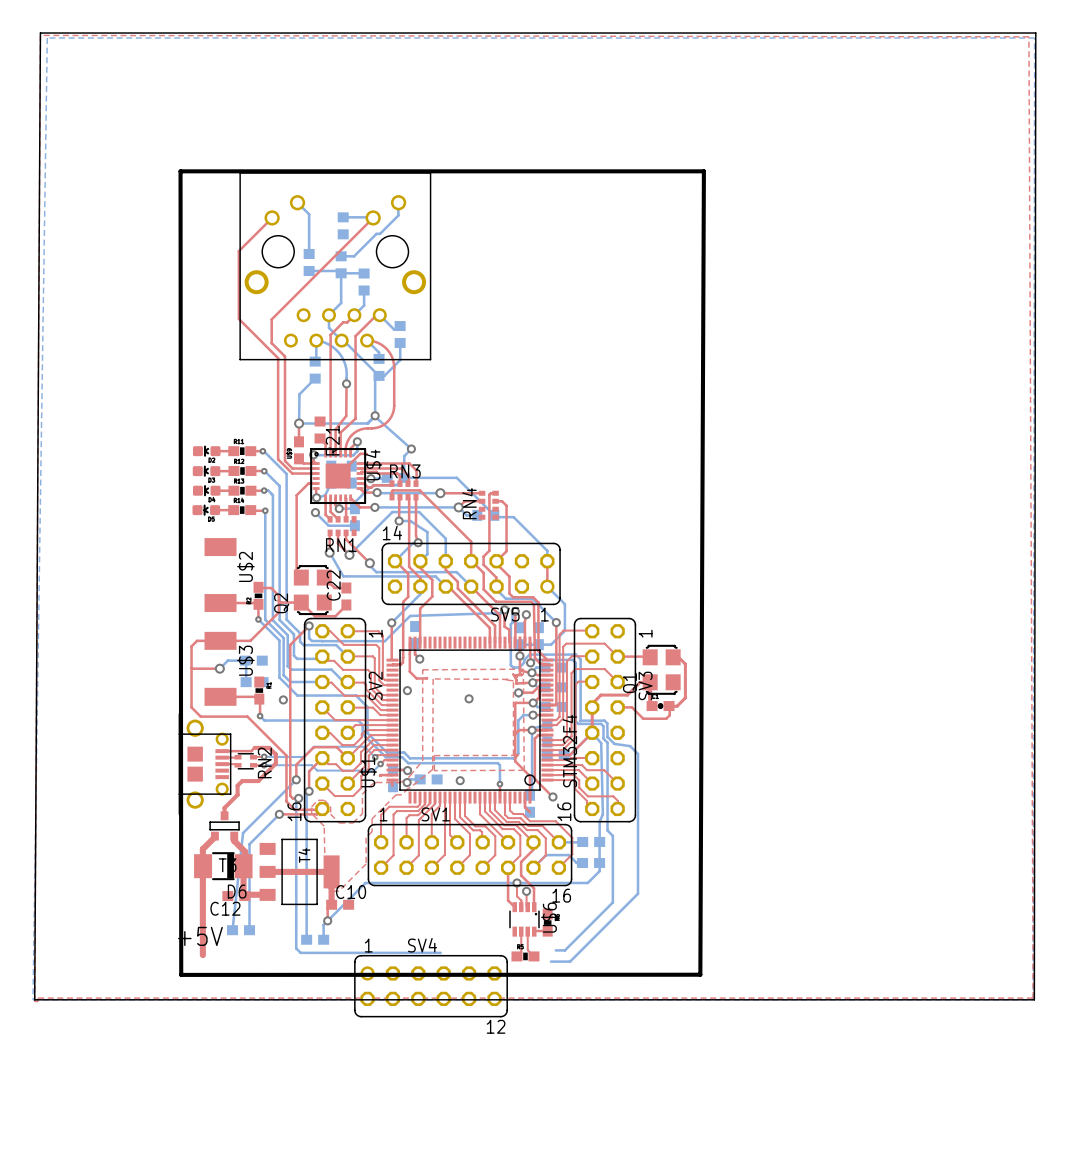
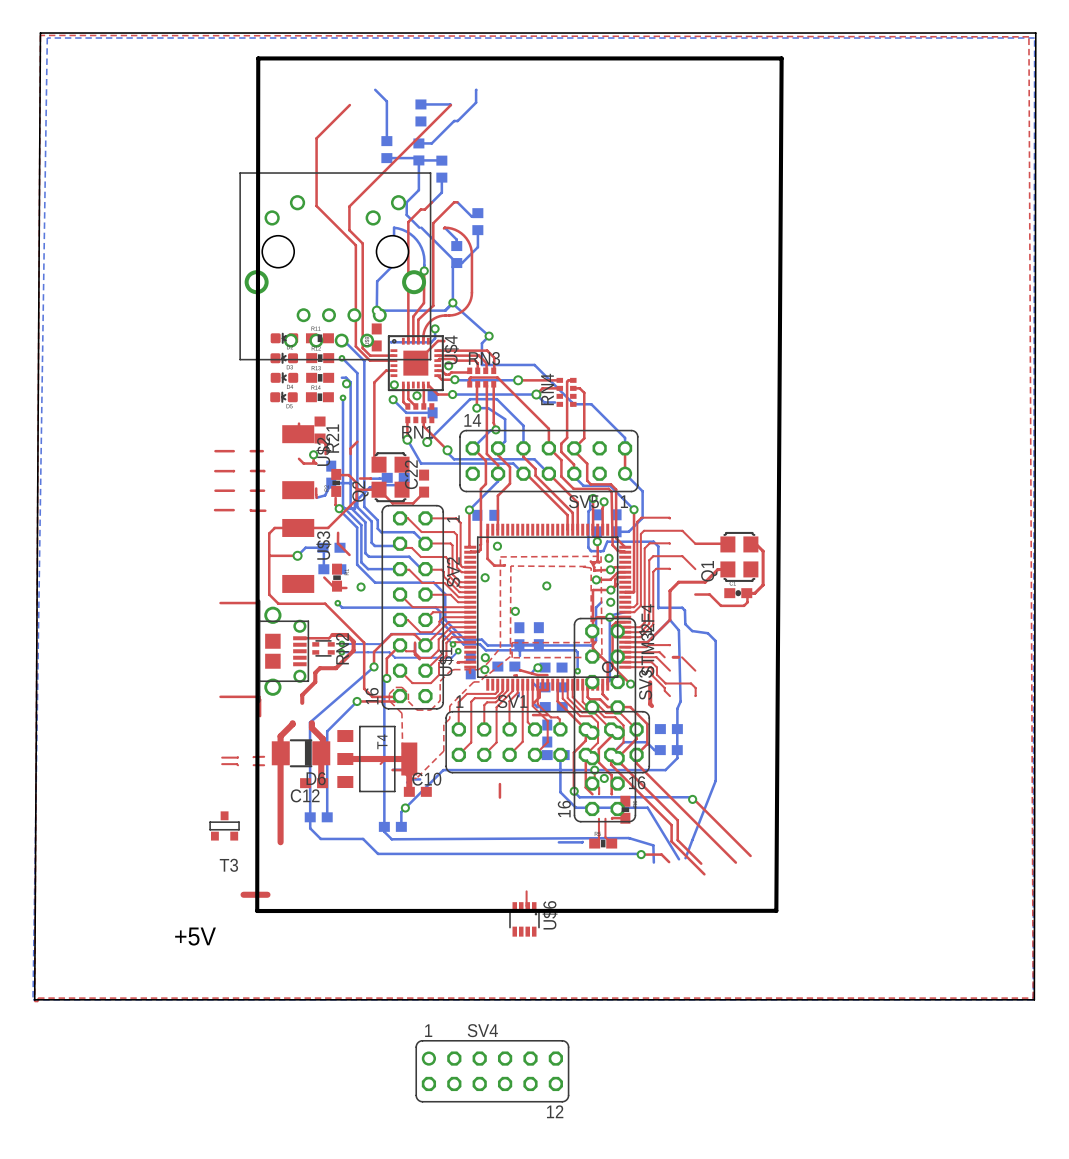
part: none -> (420, 112)
part: none -> (386, 149)
part: none -> (418, 151)
part: none -> (441, 169)
board edge: (180, 171) (181, 974) (700, 974) (703, 171) (180, 171) -> (258, 58) (257, 911) (776, 910) (781, 58) (258, 58)
bottom track: (297, 202) (309, 214) (309, 253) -> (375, 89) (386, 101) (386, 141)
bottom track: (398, 202) (398, 215) (380, 233) (376, 233) (354, 256) (341, 256) -> (476, 89) (476, 102) (457, 121) (454, 121) (431, 143) (418, 143)
top track: (272, 217) (238, 251) (238, 318) (278, 358) (278, 459) (292, 473) (316, 473) -> (349, 105) (316, 138) (316, 206) (355, 245) (355, 346) (370, 360) (393, 360)
bottom track: (343, 217) (373, 217) -> (420, 104) (450, 105)
top track: (373, 217) (271, 319) (271, 343) (284, 356) (284, 460) (292, 468) (316, 468) -> (450, 105) (349, 206) (349, 230) (362, 243) (362, 348) (370, 355) (393, 355)
part: none -> (477, 221)
part: (343, 225) -> none
part: none -> (456, 254)
part: (309, 262) -> none
part: (341, 264) -> none
bottom track: (309, 270) (338, 270) (341, 273) -> (386, 158) (416, 158) (418, 160)
via: none -> (424, 270)
bottom track: (341, 273) (364, 273) -> (418, 160) (441, 160)
bottom track: (341, 273) (341, 303) (329, 315) (329, 327) (341, 340) -> (418, 160) (418, 190) (406, 202) (406, 215) (419, 227)
part: (364, 282) -> none
bottom track: (364, 290) (364, 305) (354, 315) -> (441, 177) (441, 192) (432, 202)
via: none -> (452, 302)
via: none -> (376, 310)
top track: (354, 315) (347, 322) (343, 322) (330, 334) (330, 454) -> (432, 202) (424, 209) (420, 209) (408, 222) (408, 341)
top track: (379, 315) (376, 315) (355, 336) (355, 418) (340, 432) (340, 454) -> (457, 202) (454, 202) (433, 223) (433, 305) (418, 319) (418, 341)
bottom track: (379, 315) (394, 329) (400, 326) -> (457, 202) (471, 216) (477, 213)
via: none -> (435, 328)
part: (400, 334) -> none
via: none -> (489, 336)
bottom track: (343, 340) (379, 375) -> (421, 227) (456, 263)
bottom track: (367, 340) (379, 352) (379, 358) -> (444, 227) (456, 239) (456, 246)
top track: (366, 341) (380, 344) (392, 357) (394, 367) (394, 408) (391, 417) (382, 425) (362, 429) (352, 434) (346, 444) (345, 454) -> (444, 228) (458, 231) (469, 244) (471, 254) (471, 295) (468, 304) (460, 312) (439, 316) (429, 321) (424, 331) (423, 341)
bottom track: (400, 343) (400, 360) (384, 375) (379, 375) -> (477, 230) (477, 247) (462, 263) (456, 263)
via: none -> (341, 358)
bottom track: (316, 360) (316, 340) (332, 346) (343, 360) (346, 383) -> (394, 247) (394, 227) (410, 234) (421, 247) (424, 270)
via: none -> (448, 365)
part: (379, 367) -> none
part: (315, 370) -> none
bottom track: (379, 375) (375, 379) (375, 415) (367, 423) -> (456, 263) (452, 266) (452, 302) (445, 310)
bottom track: none -> (341, 377) (346, 377) (350, 382) (350, 507) (365, 522) (365, 553)
bottom track: (315, 378) (299, 394) (299, 423) (367, 423) -> (392, 265) (377, 281) (376, 310) (445, 310)
via: none -> (454, 379)
via: none -> (518, 380)
top track: (346, 383) (346, 415) (335, 429) (335, 454) -> (424, 270) (423, 303) (413, 316) (412, 341)
via: none -> (394, 384)
via: none -> (452, 394)
via: none -> (536, 394)
via: none -> (416, 395)
via: none -> (343, 397)
via: none -> (393, 399)
part: none -> (432, 404)
via: none -> (476, 408)
via: (375, 415) -> none
via: (299, 423) -> none
bottom track: (367, 423) (374, 416) (411, 449) (404, 456) (404, 477) (456, 477) (496, 517) (513, 517) (547, 550) (547, 561) -> (445, 310) (452, 303) (489, 336) (481, 343) (481, 364) (534, 364) (573, 404) (591, 404) (625, 437) (625, 448)
via: none -> (495, 429)
via: none -> (407, 439)
bottom track: (357, 441) (357, 451) (353, 455) (313, 454) -> (435, 328) (435, 338) (431, 342) (391, 341)
via: (357, 441) -> none
via: none -> (427, 442)
via: (411, 449) -> none
part position: (299, 450) -> (376, 337)
via: none -> (447, 450)
part position: (206, 451) -> (284, 338)
part position: (242, 451) -> (319, 338)
bottom track: (262, 451) (286, 473) (286, 619) (300, 633) (300, 641) (303, 645) (336, 645) (347, 656) -> (340, 338) (364, 361) (364, 506) (377, 520) (377, 528) (381, 532) (413, 532) (425, 543)
via: (262, 451) -> none
top track: (366, 454) (360, 453) (338, 476) -> (444, 341) (437, 340) (415, 363)
top track: (360, 463) (409, 463) (416, 470) (416, 483) -> (437, 350) (487, 350) (494, 357) (493, 370)
top track: (360, 468) (401, 468) (408, 476) (408, 483) -> (437, 355) (478, 355) (486, 363) (485, 370)
part position: (206, 471) -> (284, 358)
part position: (242, 471) -> (320, 358)
bottom track: (264, 471) (279, 486) (279, 620) (293, 634) (293, 655) (297, 658) (320, 658) (322, 656) -> (341, 358) (357, 373) (357, 507) (371, 521) (371, 542) (374, 545) (397, 545) (400, 543)
via: (264, 471) -> none
top track: (360, 473) (361, 471) (397, 473) (399, 476) (399, 483) -> (437, 360) (439, 359) (475, 360) (477, 363) (477, 370)
part: (351, 474) -> none
U$4 position: (338, 476) -> (415, 363)
via: (370, 478) -> none
top track: (316, 483) (308, 483) (296, 495) (296, 572) (301, 577) -> (393, 370) (386, 370) (374, 382) (374, 460) (379, 464)
top track: (360, 483) (364, 483) (368, 487) (392, 483) -> (437, 370) (441, 370) (445, 374) (469, 370)
top track: (360, 488) (364, 492) (377, 492) -> (437, 375) (441, 379) (454, 379)
part position: (206, 490) -> (284, 377)
part position: (242, 490) -> (320, 377)
bottom track: (264, 490) (268, 490) (272, 495) (272, 620) (287, 635) (287, 666) (291, 669) (331, 669) (343, 682) (347, 682) -> none
via: (264, 490) -> none
RN3 position: (404, 490) -> (481, 377)
bottom track: (377, 492) (440, 493) -> (454, 379) (518, 380)
via: (377, 492) -> none
top track: (440, 493) (482, 493) -> (518, 380) (559, 380)
via: (440, 493) -> none
top track: (495, 493) (489, 494) (489, 550) (483, 556) (483, 564) (496, 577) (496, 586) -> (573, 380) (567, 381) (567, 437) (561, 443) (561, 451) (574, 464) (574, 473)
via: (316, 497) -> none
top track: (325, 497) (325, 514) (330, 519) -> (403, 385) (403, 401) (407, 406)
top track: (330, 497) (330, 511) (338, 519) -> (408, 385) (408, 398) (415, 406)
top track: (345, 497) (346, 519) -> (423, 385) (423, 406)
top track: (350, 497) (360, 507) (374, 507) -> (428, 385) (437, 394) (452, 394)
top track: (392, 497) (392, 490) (419, 490) (471, 541) (471, 561) (483, 573) (483, 589) (495, 601) (531, 601) (533, 604) (534, 658) (540, 663) (547, 665) -> (469, 384) (470, 377) (497, 377) (548, 428) (548, 448) (561, 460) (561, 476) (573, 488) (608, 488) (611, 491) (612, 545) (617, 550) (625, 552)
top track: (400, 497) (399, 521) -> (477, 384) (476, 408)
top track: (408, 497) (409, 566) (420, 578) (420, 586) -> (485, 384) (486, 454) (498, 465) (498, 473)
top track: (416, 497) (416, 535) (418, 542) -> (493, 384) (493, 422) (495, 429)
bottom track: none -> (593, 498) (590, 501) (588, 511) (588, 547) (590, 550) (603, 551) (607, 541) (653, 541) (658, 546) (658, 608) (682, 607) (684, 610) (685, 624) (692, 631) (707, 633) (715, 641) (715, 780) (685, 858)
via: none -> (593, 498)
top track: (482, 501) (464, 501) (458, 507) -> (559, 388) (542, 388) (536, 394)
top track: (495, 501) (502, 501) (506, 505) (506, 551) (496, 561) (496, 563) (509, 576) (509, 593) (513, 597) (533, 597) (538, 602) (538, 651) (547, 660) -> (573, 388) (579, 388) (584, 392) (584, 438) (574, 448) (574, 450) (587, 463) (587, 480) (590, 484) (610, 484) (616, 489) (616, 538) (625, 547)
via: none -> (604, 501)
RN4 position: (488, 505) -> (566, 392)
bottom track: none -> (336, 506) (357, 527) (357, 564) (375, 582) (433, 582) (445, 594) (445, 620) (464, 639) (481, 639) (487, 645) (591, 645) (596, 640) (596, 607) (601, 602)
bottom track: (374, 507) (458, 507) (466, 515) (477, 515) -> (452, 394) (536, 394) (544, 402) (555, 402)
via: (374, 507) -> none
via: (458, 507) -> none
via: none -> (469, 509)
via: none -> (634, 509)
part position: (206, 510) -> (284, 397)
part position: (242, 510) -> (319, 397)
bottom track: (265, 510) (265, 619) (283, 638) (283, 675) (290, 682) (322, 682) -> (343, 397) (343, 506) (361, 525) (361, 562) (368, 569) (400, 569)
via: (265, 510) -> none
bottom track: (315, 512) (328, 525) (354, 525) -> (393, 399) (406, 412) (432, 412)
via: (315, 512) -> none
part: (354, 517) -> none
bottom track: (399, 521) (410, 521) (427, 532) (427, 554) (420, 561) -> (476, 408) (488, 408) (505, 419) (505, 441) (498, 448)
via: (399, 521) -> none
part: none -> (597, 523)
part: none -> (616, 523)
RN1 position: (342, 526) -> (419, 413)
top track: (330, 532) (329, 552) -> (407, 419) (407, 439)
top track: (346, 532) (345, 539) (369, 563) -> (423, 419) (423, 426) (447, 450)
via: none -> (597, 541)
bottom track: (418, 542) (412, 543) (395, 561) -> (495, 429) (490, 430) (472, 448)
via: (418, 542) -> none
top track: none -> (750, 544) (756, 544) (763, 551) (763, 585) (754, 593) (746, 593) (747, 602) (744, 605) (720, 605) (709, 594) (695, 594)
via: none -> (497, 546)
part: none -> (331, 547)
bottom track: (329, 552) (343, 576) (435, 576) (445, 586) -> (407, 439) (421, 463) (513, 463) (523, 473)
via: (329, 552) -> none
bottom track: (349, 553) (349, 554) (392, 512) (419, 512) (445, 538) (445, 561) -> (427, 440) (427, 442) (470, 399) (496, 399) (523, 425) (523, 448)
bottom track: none -> (365, 553) (368, 556) (409, 556) (421, 569) (425, 569)
via: (349, 554) -> none
via: none -> (297, 555)
via: none -> (609, 558)
top track: (395, 561) (408, 573) (408, 596) (403, 601) (402, 662) (392, 665) -> (472, 448) (485, 460) (485, 484) (480, 489) (480, 549) (470, 552)
top track: (420, 561) (420, 568) (432, 579) (432, 596) (420, 608) (420, 642) -> (498, 448) (498, 455) (510, 467) (510, 483) (497, 495) (497, 529)
top track: (445, 561) (445, 569) (457, 581) (457, 588) (495, 625) (495, 642) -> (523, 448) (523, 456) (535, 469) (535, 475) (572, 512) (572, 529)
top track: (547, 561) (547, 586) -> (625, 448) (625, 473)
bottom track: (369, 563) (376, 572) (456, 572) (471, 586) -> (447, 450) (454, 459) (534, 459) (548, 473)
via: (369, 563) -> none
part: none -> (332, 569)
via: none -> (610, 569)
SV5 position: (471, 573) -> (548, 461)
U$2 position: (220, 575) -> (298, 462)
via: none -> (485, 577)
top track: none -> (625, 577) (617, 577) (615, 579) (615, 585) (610, 590) (611, 590) (617, 584) (611, 590) (593, 590) (592, 590) (592, 648) (607, 663) (607, 684)
via: none -> (596, 579)
via: none -> (546, 585)
bottom track: (420, 586) (420, 594) (391, 622) -> (498, 473) (498, 481) (469, 509)
top track: (445, 586) (448, 586) (489, 628) (489, 642) -> (523, 473) (526, 473) (567, 515) (567, 529)
top track: (471, 586) (499, 615) (499, 642) -> (548, 473) (577, 502) (577, 529)
bottom track: (496, 586) (496, 589) (505, 598) (532, 598) (556, 622) -> (574, 473) (574, 476) (583, 485) (610, 485) (634, 509)
bottom track: (547, 586) (564, 604) (564, 630) (551, 644) (538, 644) -> (625, 473) (642, 491) (642, 517) (628, 531) (616, 531)
top track: (258, 587) (271, 588) (278, 595) (278, 612) (250, 640) (197, 640) (191, 646) (191, 707) (200, 716) (247, 716) (286, 755) (286, 801) (294, 809) (321, 809) -> (336, 474) (348, 475) (356, 482) (356, 499) (328, 527) (274, 527) (269, 533) (269, 594) (278, 603) (325, 603) (364, 642) (364, 688) (372, 696) (399, 696)
via: none -> (361, 587)
Q2 position: (312, 590) -> (390, 477)
via: none -> (610, 590)
part position: (258, 595) -> (336, 482)
C22 position: (346, 596) -> (424, 483)
top track: (278, 600) (280, 602) (301, 602) (314, 616) (335, 616) (346, 604) -> (356, 487) (358, 489) (379, 489) (392, 503) (413, 503) (424, 492)
via: none -> (610, 602)
via: none -> (337, 603)
top track: (504, 609) (504, 626) (509, 629) (509, 642) -> none
bottom track: (504, 609) (501, 613) (410, 615) (384, 641) (311, 641) (309, 638) (309, 625) -> none
via: (504, 609) -> none
top track: (515, 611) (514, 642) -> (593, 498) (592, 529)
bottom track: (515, 611) (512, 614) (510, 624) (510, 665) (513, 667) -> none
top track: (526, 614) (524, 642) -> (604, 501) (602, 529)
via: (526, 614) -> none
via: none -> (609, 617)
bottom track: (258, 619) (279, 640) (279, 677) (297, 695) (356, 695) (367, 707) (367, 733) (386, 752) (404, 752) (409, 758) (513, 758) (518, 753) (518, 720) (523, 715) (533, 715) -> none
via: (258, 619) -> none
top track: (391, 622) (392, 660) -> (469, 509) (470, 547)
via: (391, 622) -> none
top track: (556, 622) (556, 704) (547, 705) (556, 705) -> (634, 509) (634, 591) (625, 592) (633, 592)
via: (556, 622) -> none
top track: (309, 625) (290, 644) (290, 795) (292, 798) (298, 798) -> none
via: (309, 625) -> none
top track: (322, 631) (330, 631) (343, 644) (376, 644) (379, 647) (379, 680) (383, 685) (392, 685) -> (400, 518) (407, 518) (421, 532) (453, 532) (456, 535) (456, 567) (461, 572) (470, 572)
top track: (347, 631) (378, 631) (382, 635) (382, 678) (384, 680) (392, 680) -> (425, 518) (456, 518) (460, 522) (460, 565) (462, 567) (470, 567)
top track: (592, 631) (563, 630) (559, 634) (559, 716) (556, 720) (547, 720) -> (669, 518) (641, 517) (637, 521) (637, 603) (634, 607) (625, 607)
part: (415, 635) -> none
top track: (410, 642) (409, 671) (416, 678) (427, 678) -> (487, 529) (487, 558) (494, 565) (504, 565)
top track: (519, 642) (519, 673) (521, 675) (516, 676) -> (597, 529) (597, 560) (599, 562) (594, 563)
top track: (529, 642) (530, 662) -> none
via: none -> (341, 643)
via: none -> (452, 644)
via: none -> (458, 651)
via: none -> (341, 652)
top track: none -> (625, 652) (659, 652) (664, 657)
via: (519, 655) -> none
top track: (322, 656) (326, 660) (334, 660) (343, 669) (367, 669) (370, 672) (370, 688) (382, 700) (392, 700) -> (400, 543) (404, 547) (411, 547) (420, 556) (445, 556) (448, 560) (448, 575) (460, 587) (470, 587)
top track: (347, 656) (372, 656) (374, 658) (374, 687) (382, 695) (392, 695) -> (425, 543) (450, 543) (452, 545) (452, 574) (460, 582) (470, 582)
top track: (592, 656) (572, 656) (566, 661) (566, 735) (562, 740) (547, 740) -> (669, 543) (649, 543) (644, 548) (644, 622) (640, 627) (625, 627)
via: none -> (485, 657)
top track: (650, 657) (617, 656) (604, 643) (566, 643) (563, 646) (563, 718) (556, 725) (547, 725) -> (727, 544) (695, 543) (682, 530) (644, 530) (640, 533) (640, 605) (634, 612) (625, 612)
top track: (678, 657) (685, 664) (685, 697) (677, 706) (669, 706) (669, 715) (666, 718) (643, 718) (631, 707) (617, 707) -> none
top track: none -> (681, 657) (695, 670)
via: (419, 659) -> none
part: (253, 660) -> none
bottom track: (530, 662) (530, 659) (572, 659) (575, 662) (575, 721) (578, 723) (601, 723) (603, 726) (603, 738) (607, 742) (607, 830) (612, 835) (612, 902) (564, 950) (555, 950) -> none
via: (530, 662) -> none
part: none -> (470, 665)
bottom track: none -> (374, 666) (310, 722) (310, 828) (320, 838) (363, 838) (378, 853) (641, 854)
via: none -> (374, 666)
part: none -> (506, 666)
top track: (191, 667) (219, 668) -> (269, 555) (297, 555)
bottom track: (513, 667) (519, 667) (529, 654) (575, 654) (580, 659) (580, 721) (604, 720) (607, 723) (607, 737) (614, 743) (630, 746) (638, 753) (638, 893) (570, 961) (551, 961) -> none
via: none -> (537, 667)
bottom track: (219, 668) (227, 660) (245, 660) (246, 682) -> (297, 555) (305, 547) (323, 547) (323, 569)
via: (219, 668) -> none
U$3 position: (220, 668) -> (298, 555)
via: none -> (484, 669)
top zone outline: (523, 669) (422, 669) (422, 760) (410, 775) (400, 782) (372, 783) (362, 794) (362, 813) (353, 822) (339, 822) (330, 814) (330, 806) (324, 800) (318, 800) (311, 806) (311, 813) (324, 826) (325, 884) (331, 891) (338, 891) (366, 863) (366, 837) (372, 831) (372, 818) (396, 794) (401, 794) (432, 769) (433, 678) (513, 680) (513, 755) (434, 755) (434, 770) (524, 770) (523, 669) -> (601, 556) (500, 556) (500, 647) (487, 662) (478, 669) (450, 670) (440, 681) (440, 700) (430, 710) (417, 710) (408, 701) (408, 693) (402, 687) (395, 687) (389, 693) (389, 700) (401, 713) (402, 771) (409, 778) (416, 778) (443, 751) (443, 724) (449, 718) (449, 705) (473, 681) (479, 681) (510, 656) (510, 566) (591, 567) (591, 642) (511, 642) (512, 657) (601, 657) (601, 556)
Q1 position: (661, 669) -> (739, 556)
via: none -> (577, 671)
via: (531, 672) -> none
top track: (513, 674) (516, 683) (547, 680) -> (590, 561) (594, 570) (625, 567)
bottom track: none -> (386, 678) (384, 680) (384, 831) (391, 839) (628, 838) (653, 845) (653, 862)
via: none -> (386, 678)
part: (254, 682) -> none
top track: (322, 682) (331, 682) (344, 695) (366, 695) (381, 710) (392, 710) -> (400, 569) (409, 569) (422, 582) (444, 582) (458, 597) (470, 597)
top track: (347, 682) (363, 682) (366, 689) (381, 705) (392, 705) -> (425, 569) (441, 569) (443, 576) (459, 592) (470, 592)
via: (532, 682) -> none
top track: (592, 682) (578, 681) (575, 684) (575, 737) (562, 750) (547, 750) -> (669, 569) (656, 568) (653, 571) (653, 624) (640, 637) (625, 637)
top track: (617, 682) (604, 669) (575, 669) (571, 673) (571, 736) (562, 745) (547, 745) -> (695, 569) (682, 556) (653, 556) (649, 560) (649, 623) (640, 632) (625, 632)
top track: (650, 682) (640, 682) (627, 695) (600, 695) (592, 703) (592, 732) (569, 755) (547, 755) -> (727, 569) (717, 569) (705, 582) (678, 582) (669, 590) (669, 619) (647, 642) (625, 642)
top track: none -> (512, 684) (512, 691) (498, 705)
top track: none -> (557, 684) (557, 701) (585, 729) (585, 740) (573, 752) (574, 791)
top track: none -> (572, 684) (572, 697) (584, 709) (596, 709) (604, 717) (615, 717) (623, 725) (623, 742) (611, 754) (611, 764) (671, 825) (671, 841) (704, 874)
top track: none -> (587, 684) (587, 697) (589, 699) (600, 699) (607, 707) (630, 707) (647, 724) (647, 744) (636, 754) (636, 763) (735, 862)
via: none -> (630, 684)
top track: (547, 685) (540, 685) (532, 692) (518, 692) -> (625, 572) (618, 572) (610, 579) (596, 579)
part position: (259, 690) -> (337, 577)
via: (407, 690) -> none
via: (518, 692) -> none
via: (469, 698) -> none
via: (283, 699) -> none
via: none -> (357, 701)
top track: (533, 702) (515, 703) (515, 761) (529, 776) (529, 797) -> none
via: (533, 702) -> none
top track: none -> (498, 705) (496, 707) (496, 742) (484, 754)
part position: (660, 706) -> (738, 593)
top track: (322, 707) (335, 720) (392, 720) -> (400, 594) (412, 607) (470, 607)
top track: (347, 707) (372, 707) (380, 715) (392, 715) -> (425, 594) (450, 594) (458, 602) (470, 602)
via: (533, 715) -> none
bottom track: (260, 716) (264, 720) (358, 720) (362, 724) (362, 734) (385, 757) (402, 757) (408, 763) (497, 763) (499, 765) (499, 784) -> (337, 603) (342, 607) (435, 607) (440, 612) (440, 621) (463, 644) (479, 644) (485, 650) (575, 650) (577, 652) (577, 671)
via: (260, 716) -> none
SV2 position: (335, 720) -> (412, 607)
U$1 position: (470, 720) -> (547, 607)
top track: (392, 725) (355, 725) (347, 732) -> (470, 612) (433, 612) (425, 619)
bottom track: (547, 725) (532, 730) (532, 793) (530, 795) -> (624, 612) (609, 617) (609, 680) (607, 682)
top track: none -> (636, 729) (636, 738) (621, 753) (621, 764) (677, 820) (677, 840) (701, 863)
part: none -> (668, 729)
top track: (392, 730) (366, 730) (354, 745) (342, 745) (330, 733) (322, 732) -> (470, 617) (443, 617) (431, 632) (420, 632) (408, 620) (400, 619)
via: (532, 730) -> none
top track: (547, 730) (519, 730) (515, 734) -> (625, 617) (596, 617) (592, 621)
top track: (392, 735) (370, 735) (347, 758) (336, 747) (313, 747) (296, 764) (296, 779) -> (470, 622) (448, 622) (425, 645) (414, 634) (391, 634) (374, 651) (374, 666)
top track: (547, 735) (538, 735) (534, 738) (534, 779) (550, 794) -> (625, 622) (616, 622) (612, 625) (612, 666) (628, 681)
top track: (392, 740) (373, 740) (360, 752) (360, 763) -> (470, 627) (450, 627) (438, 639) (438, 650)
top track: (392, 745) (374, 745) (365, 754) (365, 766) (347, 783) -> (470, 632) (451, 632) (442, 641) (442, 653) (425, 670)
top track: (392, 750) (374, 750) (368, 755) (368, 768) (361, 776) (361, 787) (353, 796) (334, 796) (322, 783) -> (470, 637) (452, 637) (446, 642) (446, 655) (439, 663) (439, 675) (430, 683) (412, 683) (400, 670)
part: none -> (668, 750)
top track: (222, 751) (251, 751) (254, 747) (269, 747) (275, 754) (275, 763) (258, 781) (242, 781) (237, 785) (237, 794) (224, 807) (224, 815) -> (299, 638) (329, 638) (332, 634) (346, 634) (353, 641) (353, 650) (336, 668) (319, 668) (315, 672) (315, 682) (302, 695) (302, 702)
bottom track: none -> (560, 754) (560, 792) (575, 807) (647, 807) (679, 859)
top track: (392, 755) (377, 755) (375, 757) -> (470, 642) (455, 642) (452, 644)
top track: (517, 755) (515, 757) -> (595, 642) (592, 644)
bottom track: (564, 755) (569, 755) (592, 732) (601, 743) (602, 814) (599, 821) (599, 841) -> (641, 642) (647, 642) (669, 619) (678, 630) (680, 701) (677, 708) (677, 729)
bottom track: (264, 756) (303, 756) (313, 746) (364, 746) (375, 757) -> (341, 643) (381, 644) (391, 633) (442, 633) (452, 644)
via: (264, 756) -> none
via: (375, 757) -> none
top track: (592, 758) (547, 760) -> (669, 645) (625, 647)
top track: none -> (345, 759) (409, 759) (409, 791)
RN2 position: (245, 761) -> (323, 648)
top track: (360, 763) (353, 770) (342, 770) (336, 764) (328, 764) (322, 758) (309, 771) (309, 791) -> (438, 650) (430, 657) (420, 657) (413, 651) (406, 651) (400, 645) (386, 658) (386, 678)
part position: (204, 764) -> (282, 651)
bottom track: (380, 764) (374, 770) (317, 770) (311, 765) (264, 765) -> (458, 651) (451, 657) (394, 657) (389, 652) (341, 652)
via: (380, 764) -> none
via: (264, 765) -> none
top track: (547, 765) (581, 765) (587, 770) (604, 770) (617, 783) -> none
via: (407, 770) -> none
top track: (547, 770) (578, 770) (592, 783) -> (625, 657) (656, 657) (669, 670)
via: none -> (594, 770)
top track: (392, 775) (380, 775) -> (470, 662) (458, 662)
top track: (547, 775) (574, 775) (579, 780) (579, 787) (587, 796) (613, 796) (617, 800) (617, 808) -> (625, 662) (651, 662) (656, 667) (656, 674) (665, 683) (691, 683) (695, 688) (695, 696)
part: (393, 778) -> none
via: none -> (604, 778)
bottom track: (296, 779) (243, 833) (232, 930) -> none
via: (296, 779) -> none
part: (428, 779) -> none
top track: (392, 780) (392, 785) -> (470, 667) (470, 672)
via: (460, 780) -> none
top track: (547, 780) (573, 780) (574, 788) (592, 808) -> (625, 667) (650, 667) (652, 675) (669, 696)
via: (407, 782) -> none
via: (499, 784) -> none
bottom track: (309, 791) (306, 793) (306, 939) -> none
via: (309, 791) -> none
bottom track: none -> (574, 791) (579, 797) (690, 797) (692, 799)
via position: (552, 796) -> (574, 791)
top track: (420, 797) (420, 804) (417, 806) (389, 806) (380, 815) (380, 842) -> (497, 684) (497, 691) (495, 693) (466, 693) (458, 702) (458, 729)
top track: (425, 797) (425, 804) (418, 811) (397, 811) (393, 814) (393, 855) (381, 867) -> (502, 684) (502, 691) (495, 698) (474, 698) (471, 701) (471, 742) (458, 754)
top track: (430, 797) (430, 803) (418, 815) (409, 815) (406, 818) (406, 842) -> (507, 684) (507, 690) (495, 702) (487, 702) (484, 705) (484, 729)
top track: (435, 797) (435, 803) (418, 820) (418, 855) (406, 867) -> none
top track: (440, 797) (440, 805) (431, 814) (431, 842) -> (517, 684) (517, 692) (509, 701) (509, 729)
top track: (445, 797) (445, 854) (431, 867) -> (522, 684) (522, 741) (509, 754)
top track: (450, 797) (450, 835) (457, 842) -> (527, 684) (527, 722) (535, 729)
top track: (455, 797) (455, 818) (469, 833) (469, 855) (457, 867) -> (532, 684) (532, 706) (547, 721) (547, 742) (535, 754)
top track: (460, 797) (460, 817) (473, 830) (482, 832) (482, 842) -> (537, 684) (537, 704) (550, 717) (559, 719) (560, 729)
top track: (465, 797) (465, 815) (475, 826) (485, 826) (495, 836) (495, 855) (482, 867) -> none
top track: (480, 797) (480, 814) (508, 842) -> none
top track: (485, 797) (485, 811) (502, 829) (513, 829) (520, 835) (520, 855) (508, 867) (508, 900) (514, 907) -> (562, 684) (562, 698) (580, 716) (591, 716) (598, 722) (598, 742) (585, 754) (585, 787) (592, 794)
top track: (489, 797) (489, 810) (504, 825) (516, 825) (533, 842) (533, 849) (521, 862) (521, 875) (534, 888) (534, 907) -> (567, 684) (567, 698) (582, 712) (594, 712) (611, 729) (611, 736) (598, 749) (598, 762) (611, 775) (611, 794)
top track: (494, 797) (494, 810) (506, 822) (518, 822) (526, 830) (537, 830) (545, 838) (545, 855) (533, 867) -> none
top track: (504, 797) (504, 814) (508, 818) (520, 818) (528, 826) (542, 826) (558, 842) -> (582, 684) (582, 701) (586, 705) (598, 705) (606, 713) (620, 713) (636, 729)
top track: (509, 797) (509, 810) (513, 813) (522, 813) (529, 821) (555, 821) (572, 837) (572, 854) (558, 867) -> none
top track: (524, 797) (524, 807) (530, 812) -> (602, 684) (602, 694) (607, 699)
bottom track: (298, 798) (296, 800) (296, 948) (300, 952) (440, 952) -> none
via: (298, 798) -> none
top track: none -> (692, 799) (750, 855)
via: none -> (692, 799)
part: (530, 803) -> none
via: none -> (405, 807)
top track: (322, 808) (316, 814) (279, 814) -> (400, 696) (394, 701) (357, 701)
bottom track: (279, 814) (249, 844) (249, 930) -> (357, 701) (327, 731) (327, 817)
via: (279, 814) -> none
part: none -> (318, 817)
part: none -> (392, 826)
top track: (214, 836) (202, 849) (202, 955) -> (292, 723) (280, 736) (280, 842)
top track: (234, 836) (234, 840) (245, 851) (243, 866) (244, 896) -> (311, 723) (311, 728) (322, 738) (321, 753) (322, 783)
part: (591, 841) -> none
bottom track: (599, 842) (599, 862) -> (677, 729) (677, 750)
top track: none -> (641, 854) (661, 854) (669, 862)
via: none -> (641, 854)
SV1 position: (470, 855) -> (547, 742)
bottom track: (582, 862) (576, 862) (568, 855) (546, 855) (533, 867) -> (660, 750) (654, 750) (646, 742) (623, 742) (611, 754)
part: (591, 862) -> none
bottom track: (599, 863) (599, 871) (587, 882) (365, 882) (323, 924) (323, 939) -> (677, 750) (677, 758) (665, 770) (443, 770) (401, 812) (401, 826)
D6 position: (223, 866) -> (301, 753)
top track: (267, 871) (331, 871) (331, 904) (327, 908) (327, 920) -> none
T4 position: (299, 871) -> (377, 759)
top track: (517, 882) (517, 896) (521, 900) (521, 907) -> (594, 770) (594, 783) (599, 787) (598, 794)
via: (517, 882) -> none
via: (526, 891) -> none
C12 position: (236, 896) -> (314, 783)
C10 position: (340, 904) -> (417, 791)
via: (327, 920) -> none
part position: (547, 922) -> (625, 809)
part: (241, 930) -> none
top track: (521, 931) (521, 952) (516, 956) -> (598, 818) (598, 839) (594, 843)
top track: (527, 931) (527, 950) (533, 956) -> (605, 818) (605, 837) (611, 843)
top track: (547, 931) (534, 931) -> (625, 818) (611, 818)
part: (315, 939) -> none
part position: (525, 956) -> (603, 843)
SV4 position: (431, 986) -> (492, 1071)

